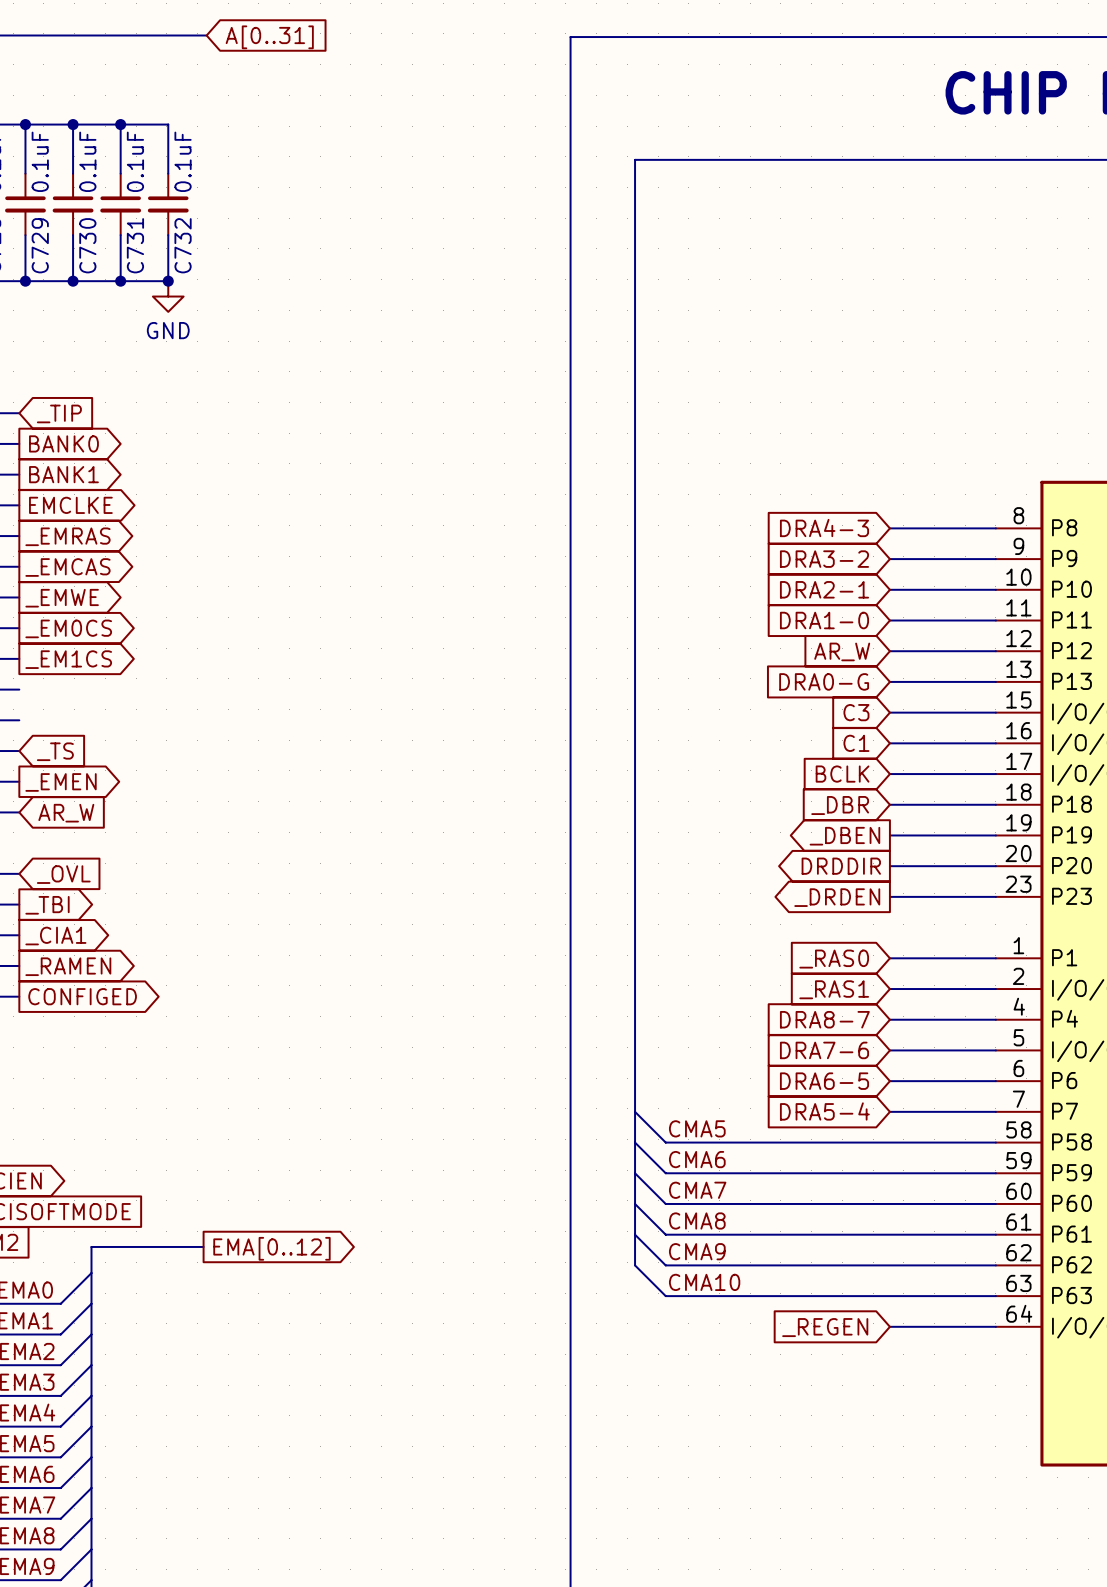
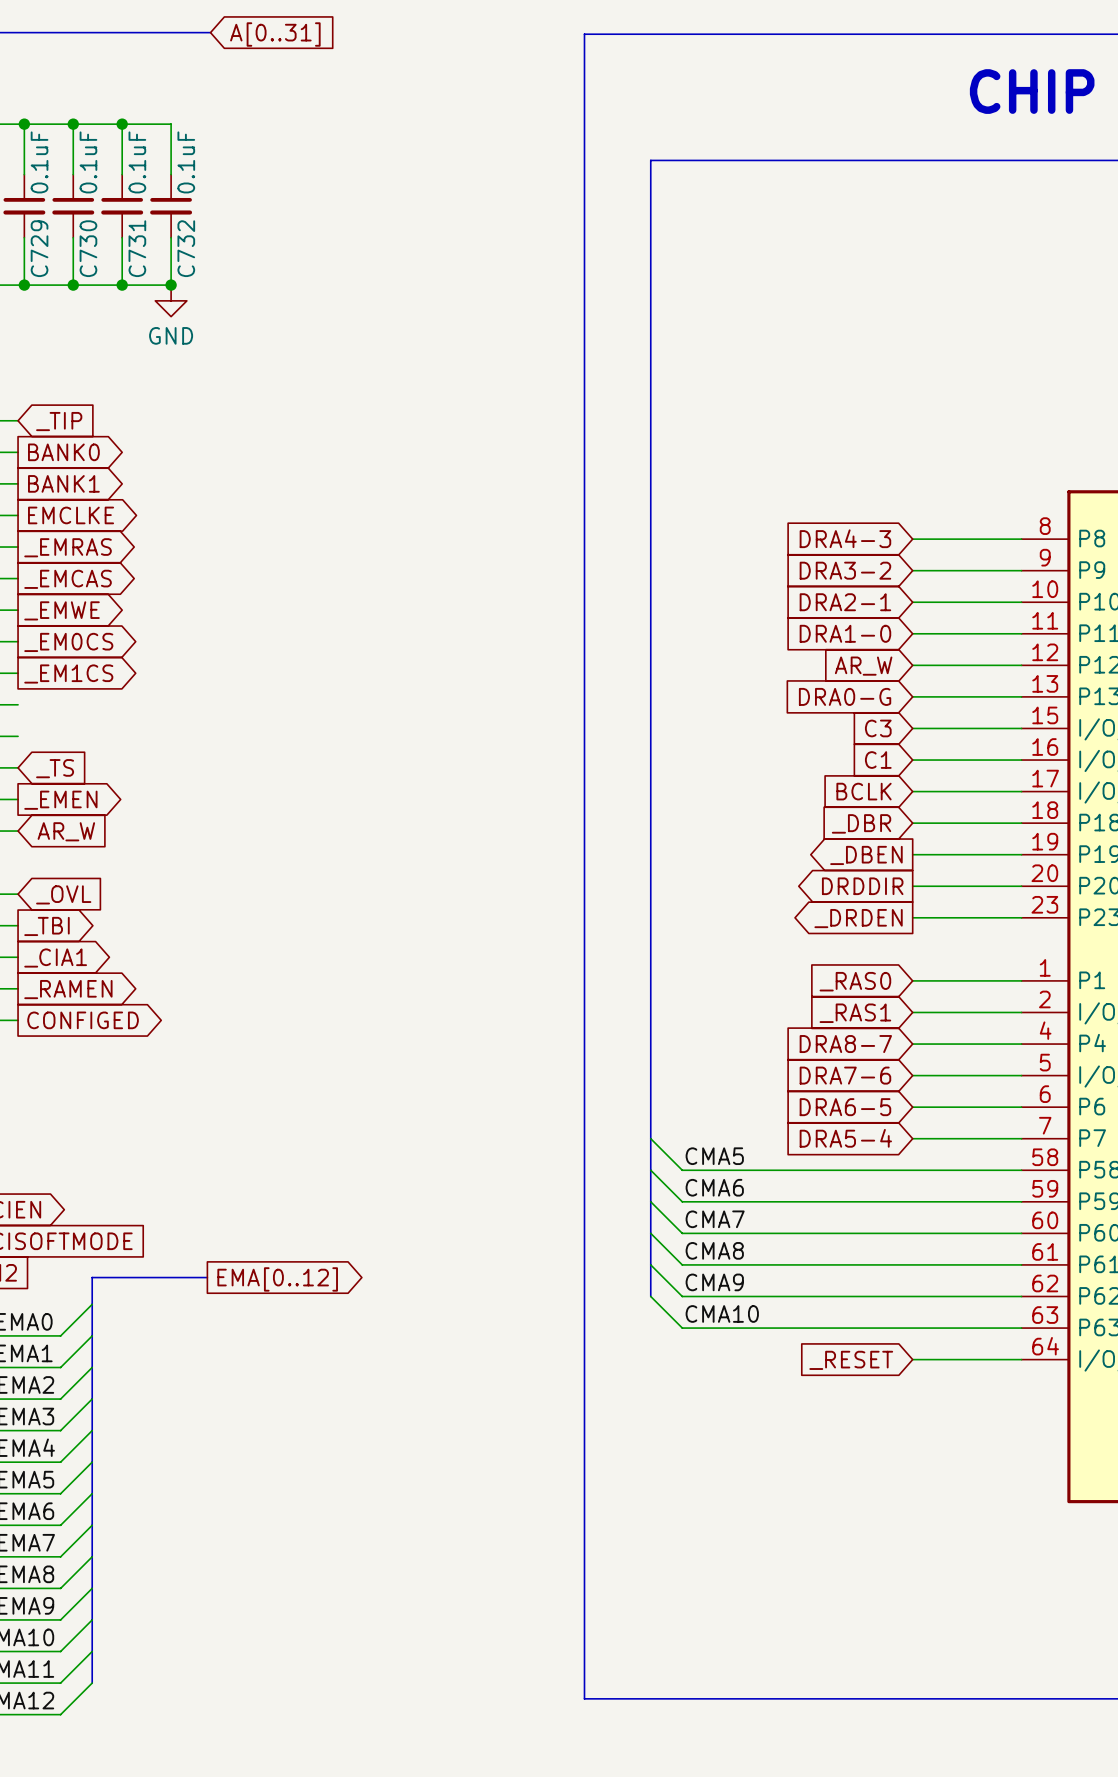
global label: _REGEN (825, 1327) -> _RESET (851, 1360)

